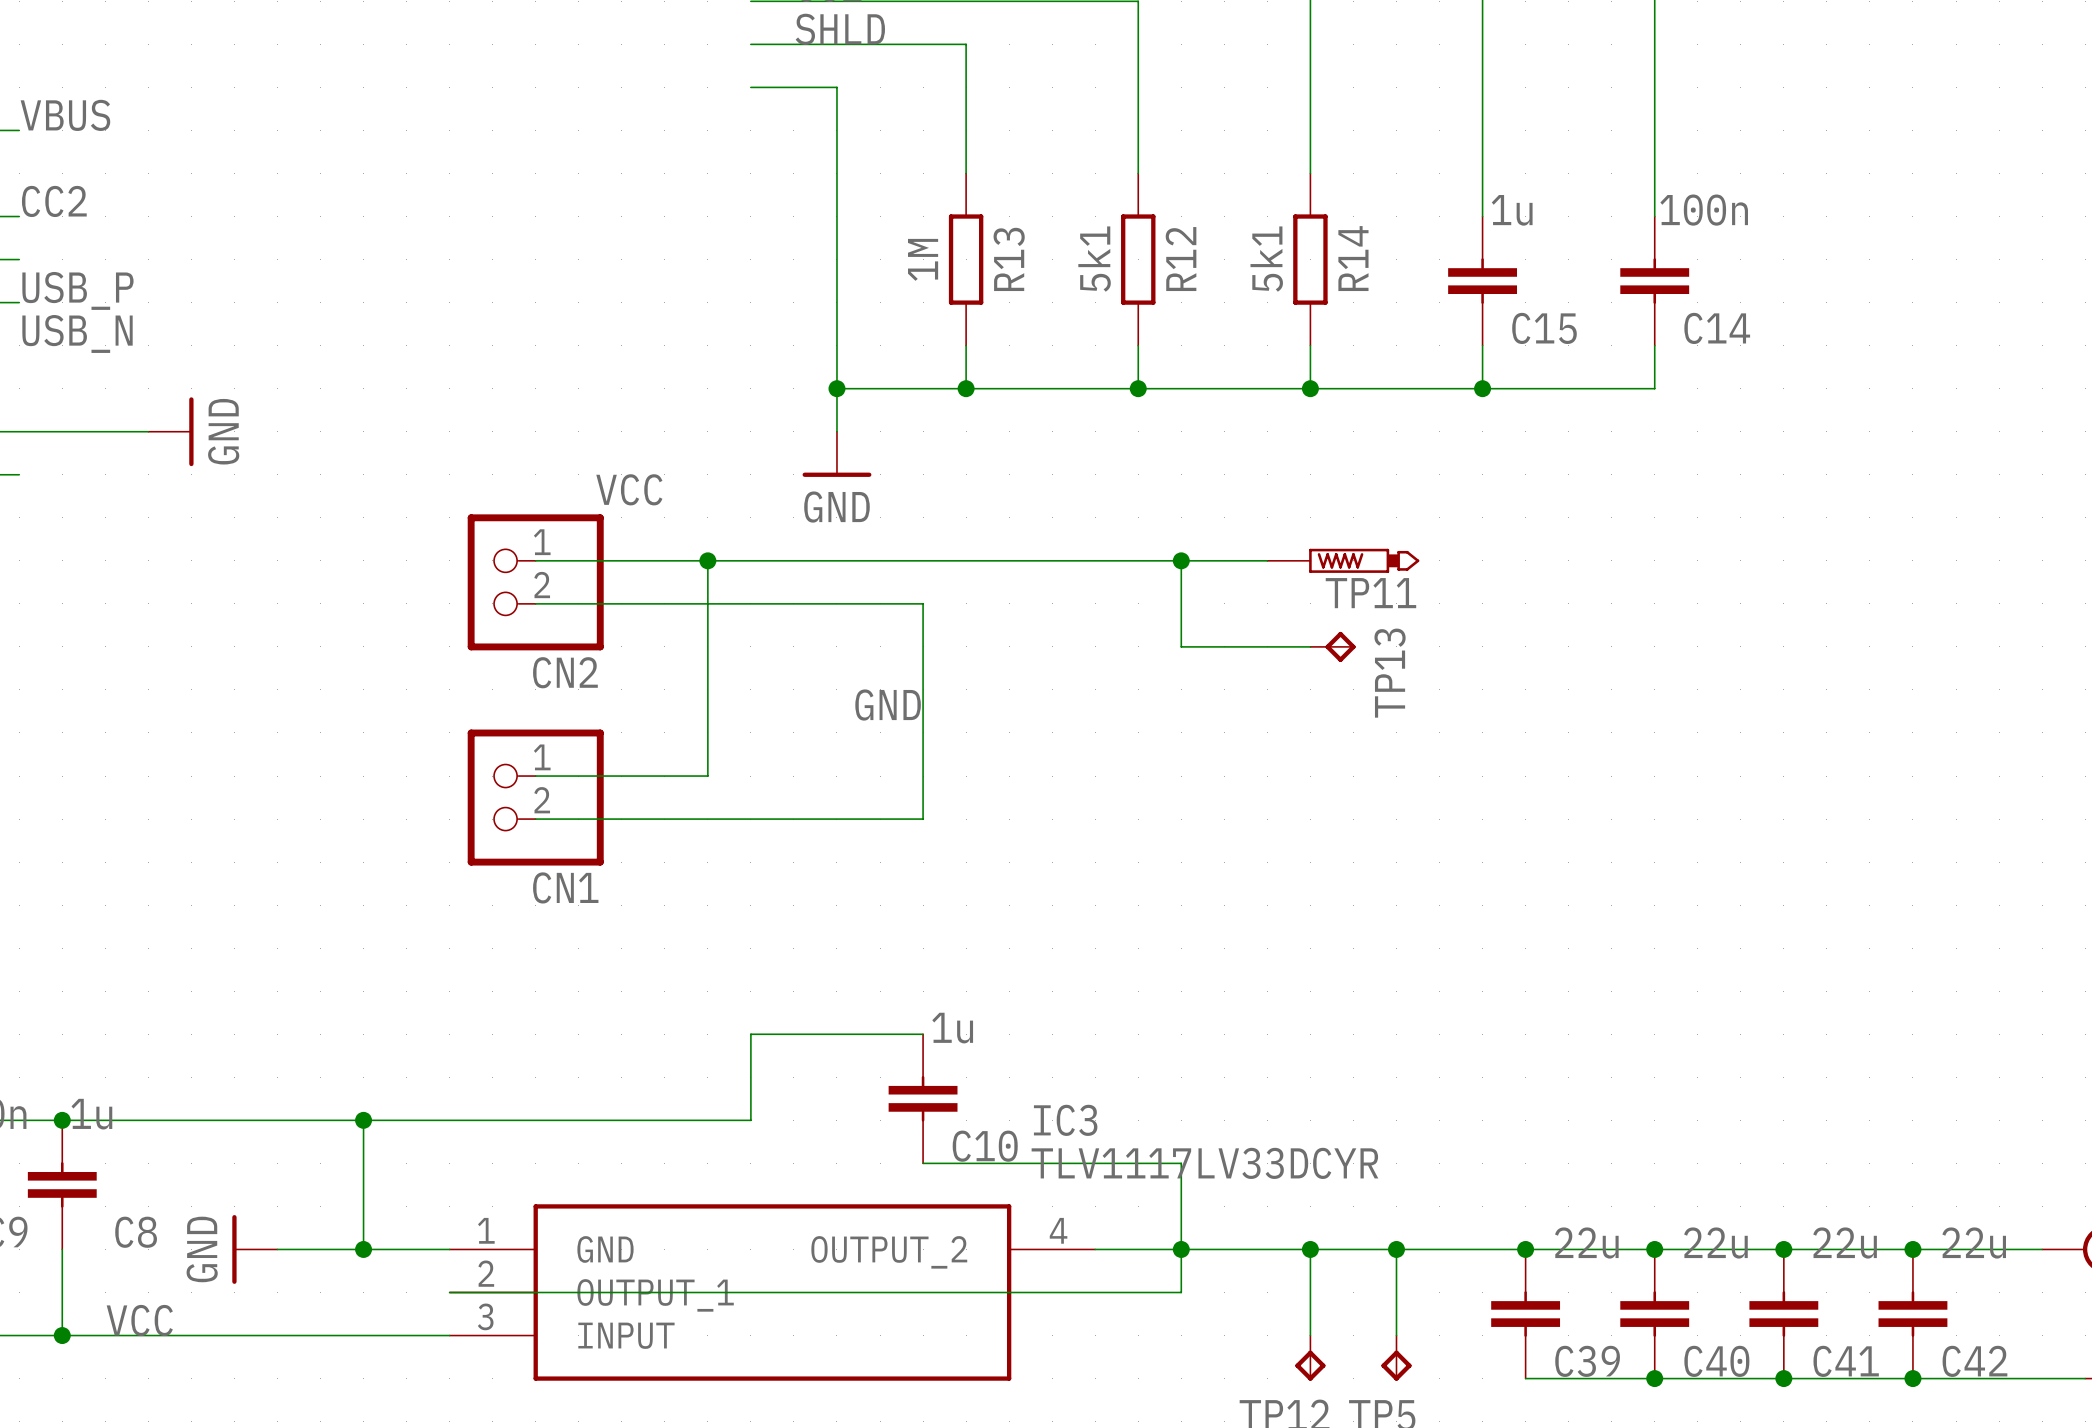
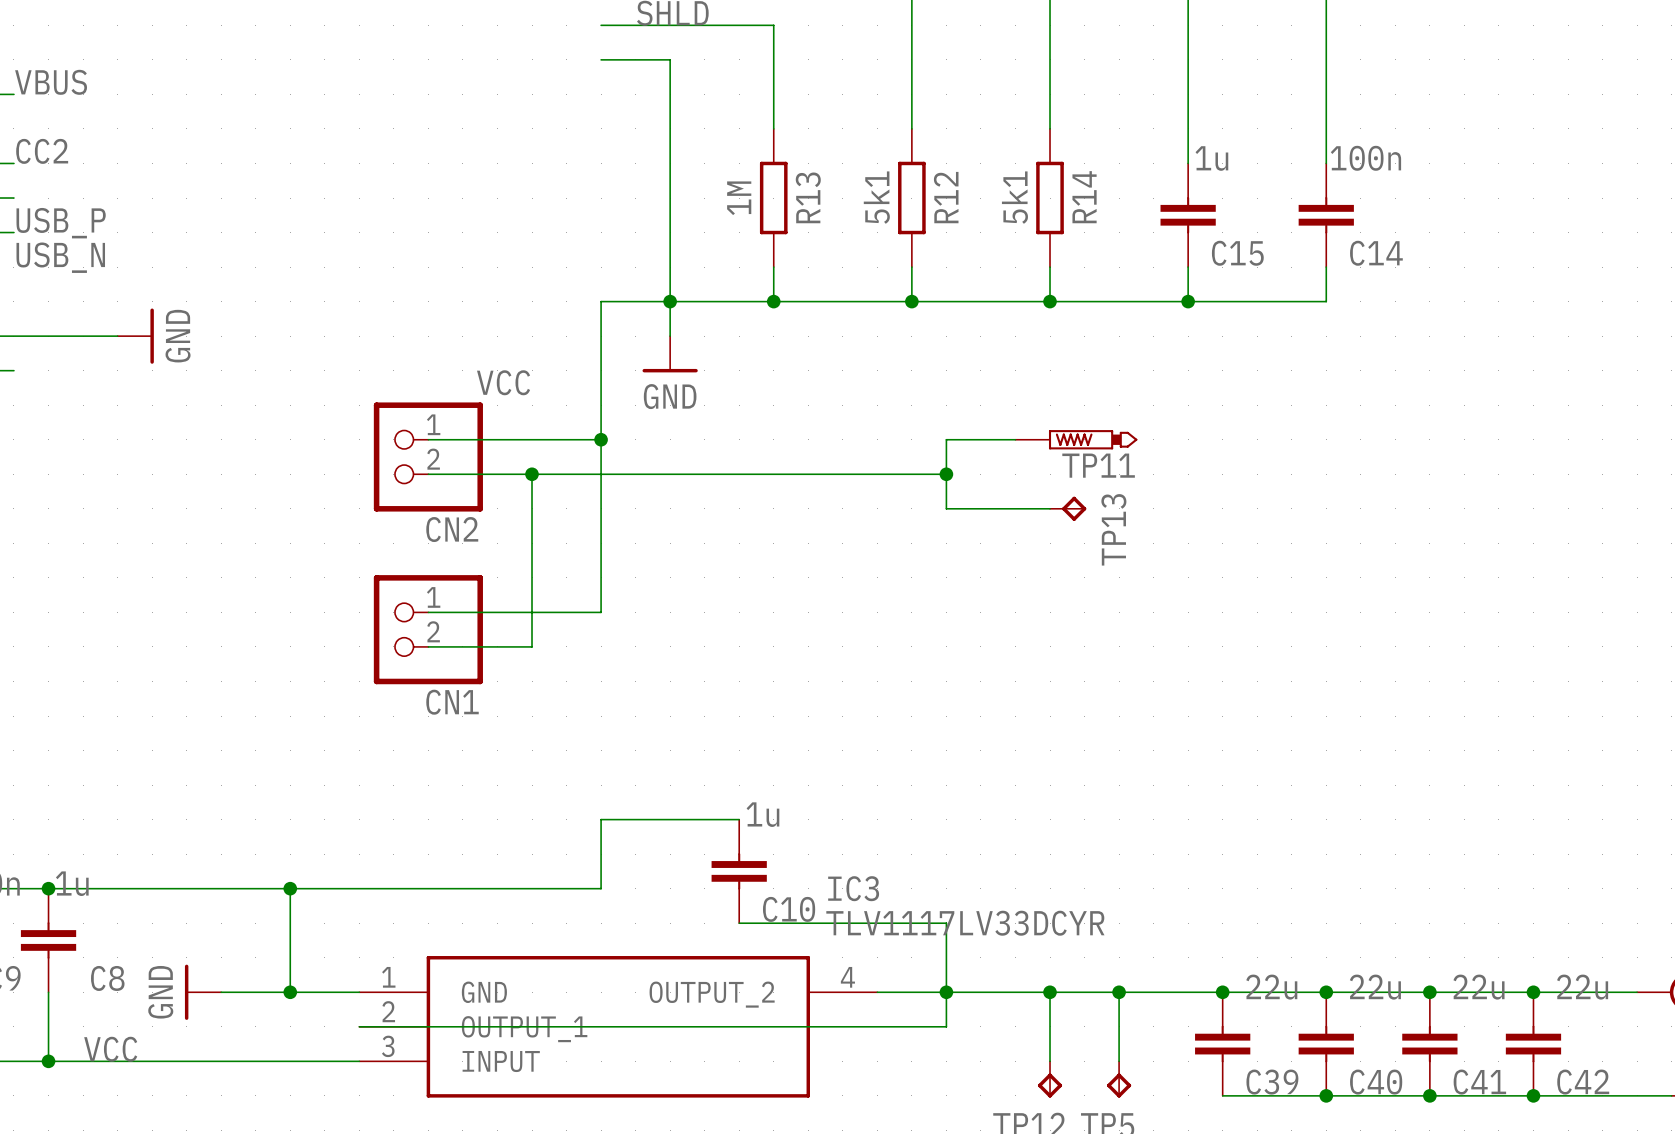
wire: (707, 560) (707, 776) -> (670, 301) (601, 301) (601, 612) (566, 612)
junction: (707, 560) -> none
wire: (750, 560) (1181, 560) -> none
junction: none -> (601, 439)
junction position: (1181, 560) -> (946, 474)
junction: none -> (532, 474)
wire: (923, 603) (923, 819) (664, 819) -> (532, 474) (532, 646)
wire: none -> (739, 474) (946, 474)
label: GND (888, 705) -> none

